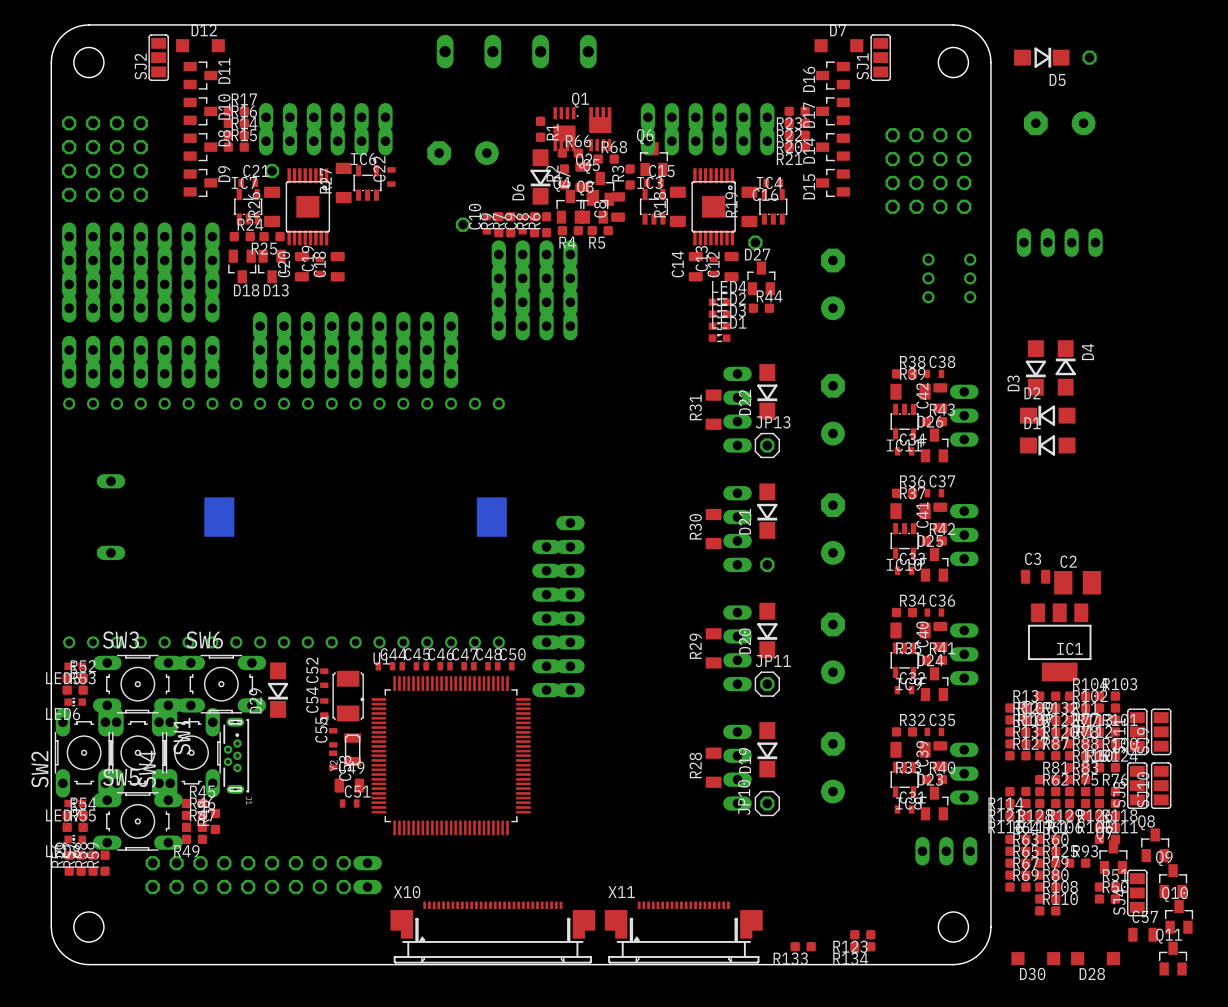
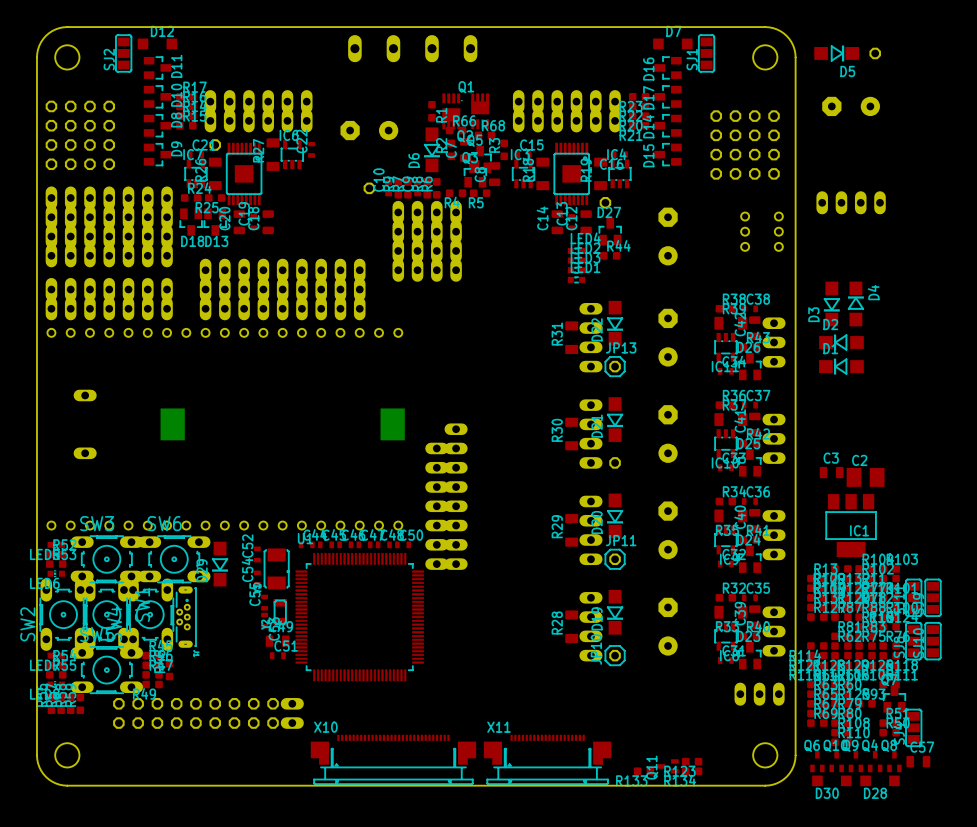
Q6 footprint: [639, 142, 669, 176] -> [810, 750, 825, 773]
Q4 footprint: [556, 189, 585, 224] -> [867, 750, 883, 773]
Q8 footprint: [1141, 828, 1170, 863] -> [887, 750, 902, 773]
Q9 footprint: [1159, 864, 1188, 898] -> [848, 750, 864, 773]
Q10 footprint: [1164, 899, 1194, 934] -> [829, 750, 844, 773]
Q11 name position: Q11 (1169, 936) -> Q11 (652, 767)
Q11 footprint: [1159, 941, 1188, 976] -> [657, 759, 679, 774]

